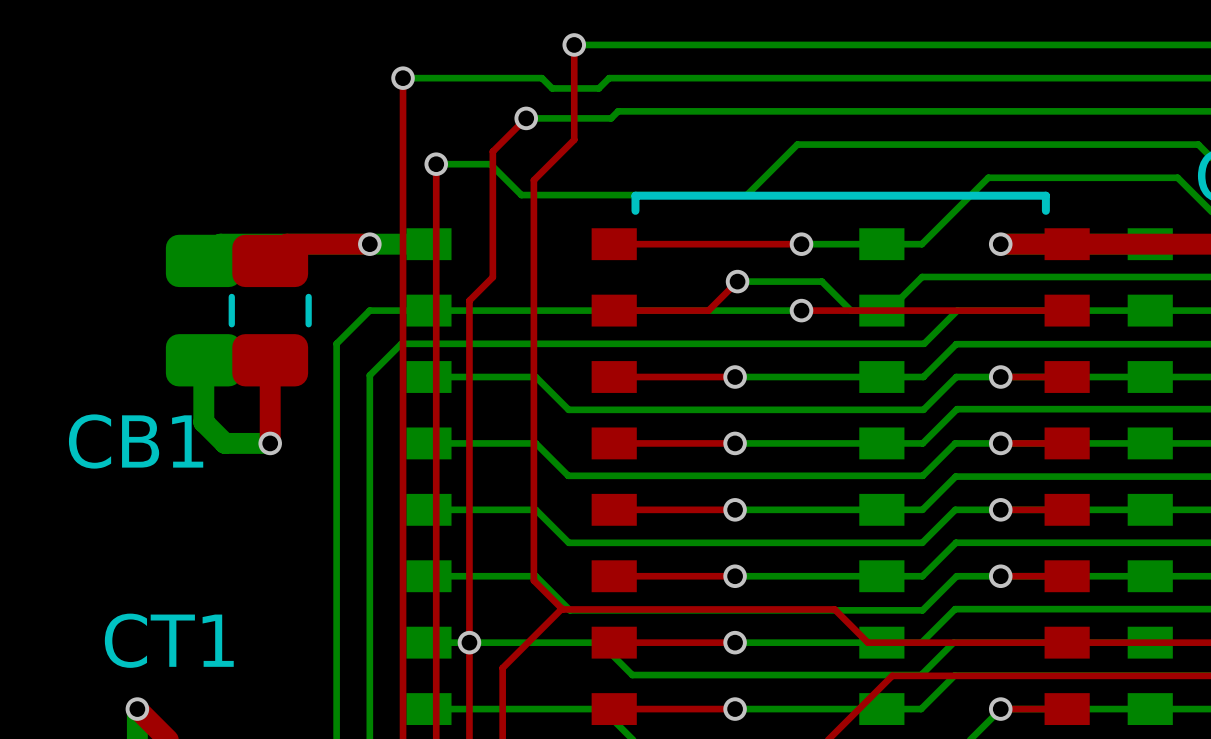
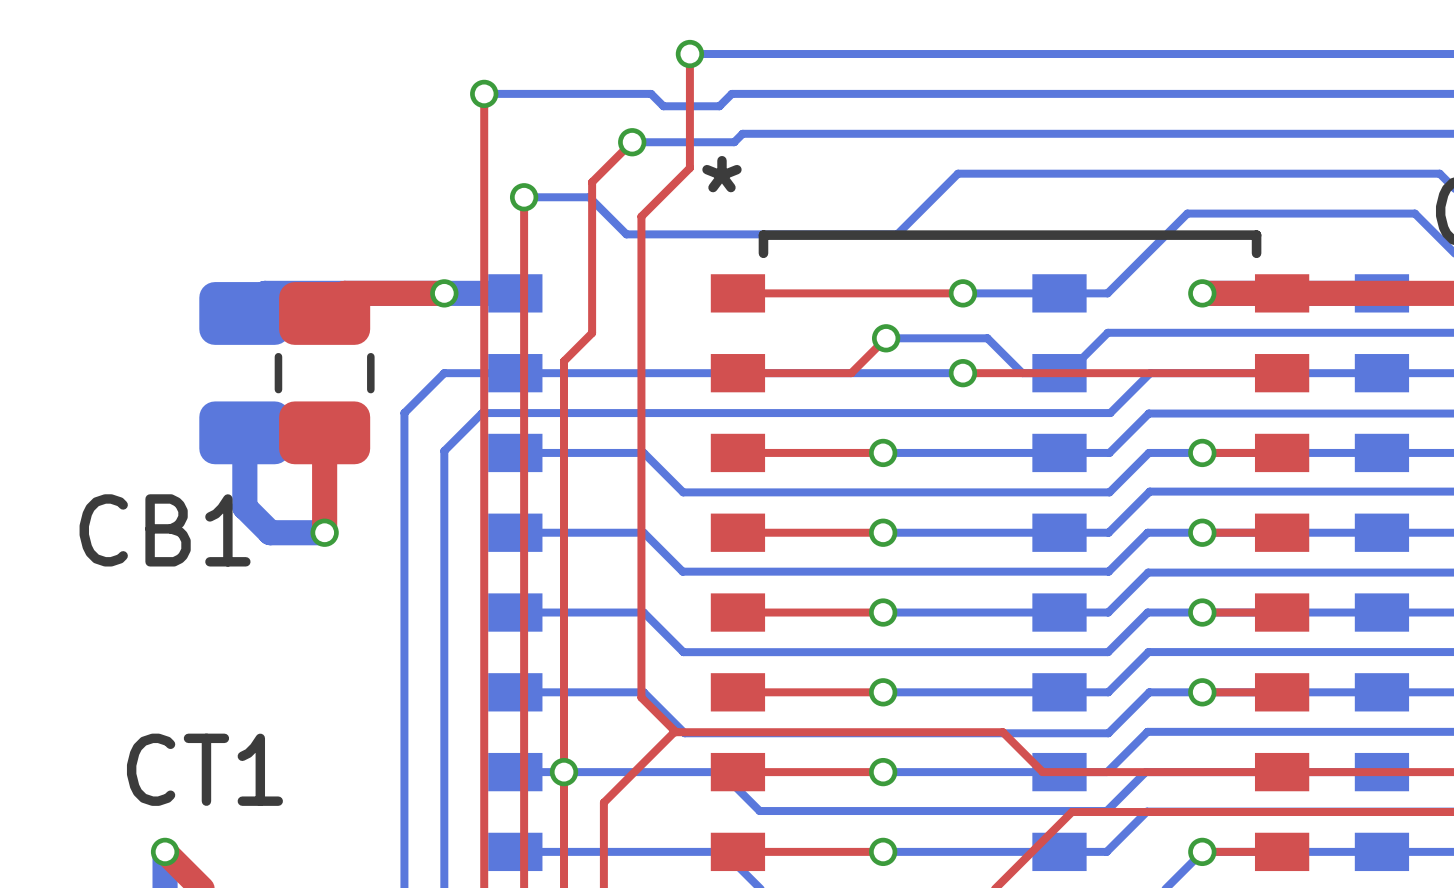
part text: none -> * (721, 174)

